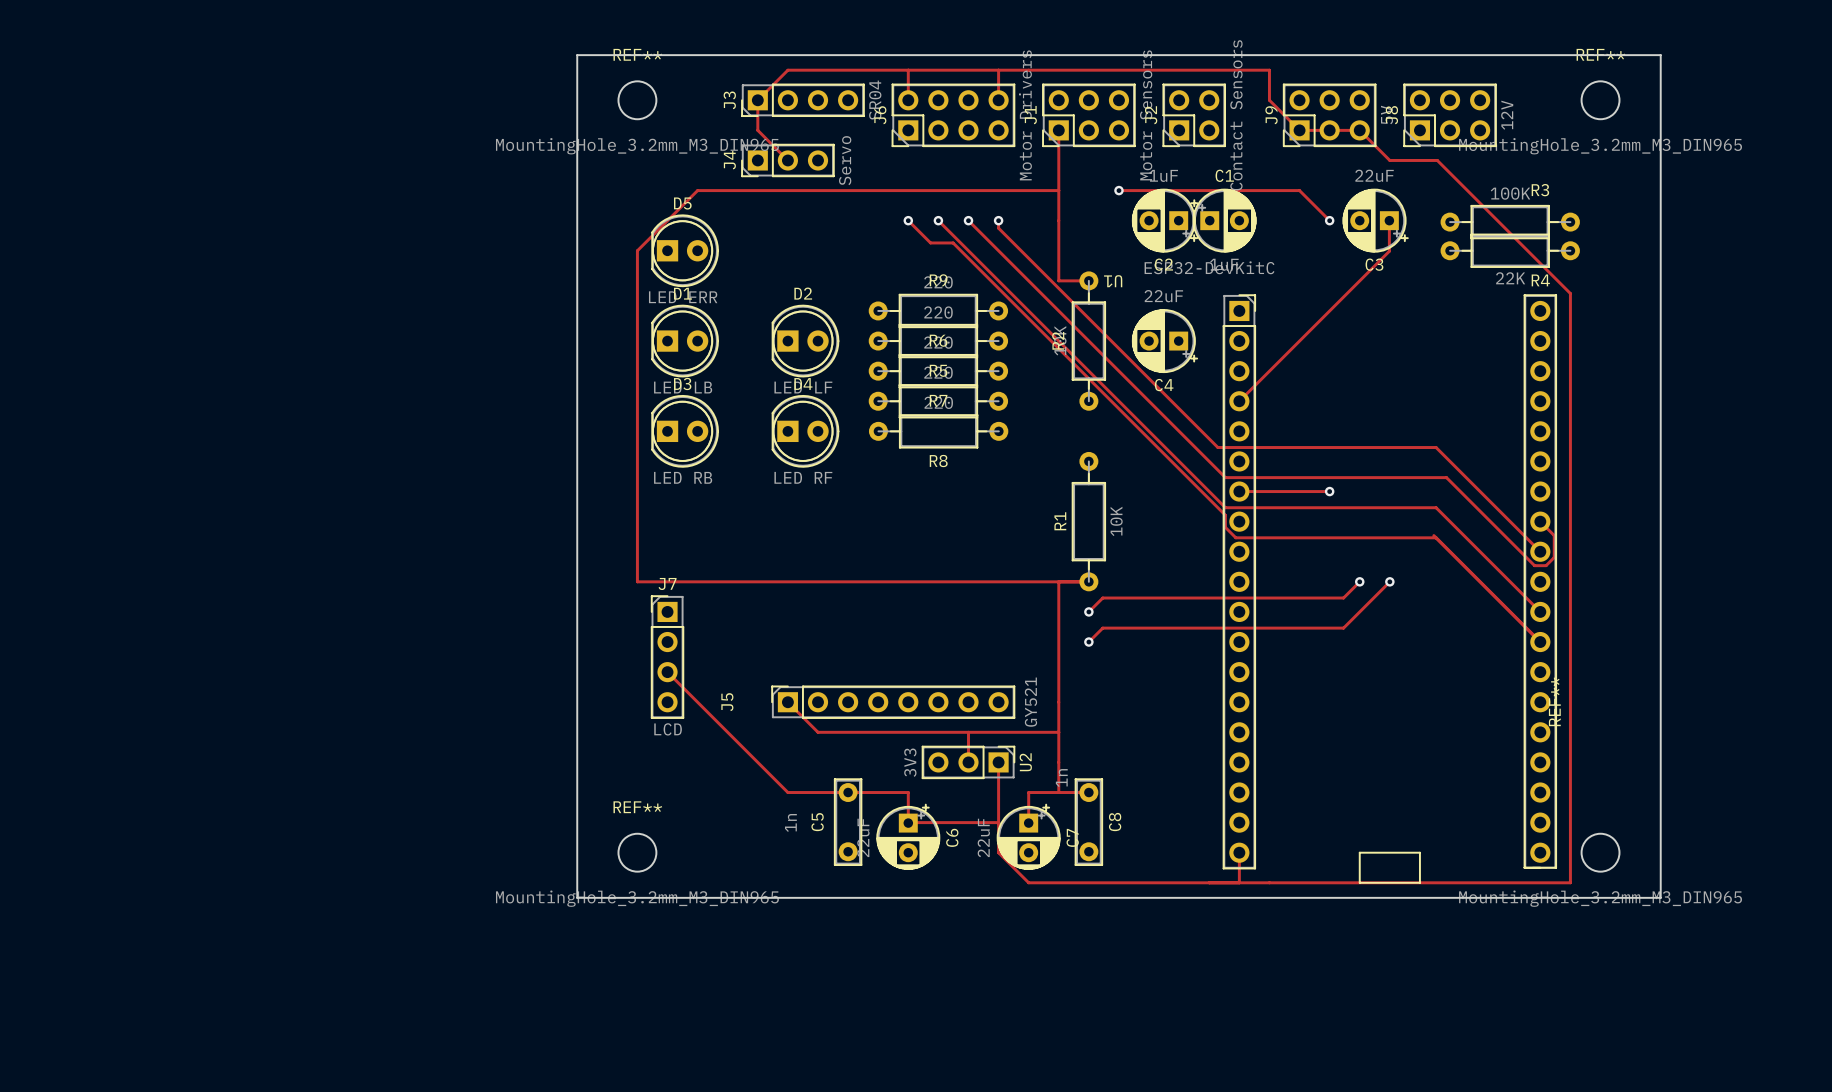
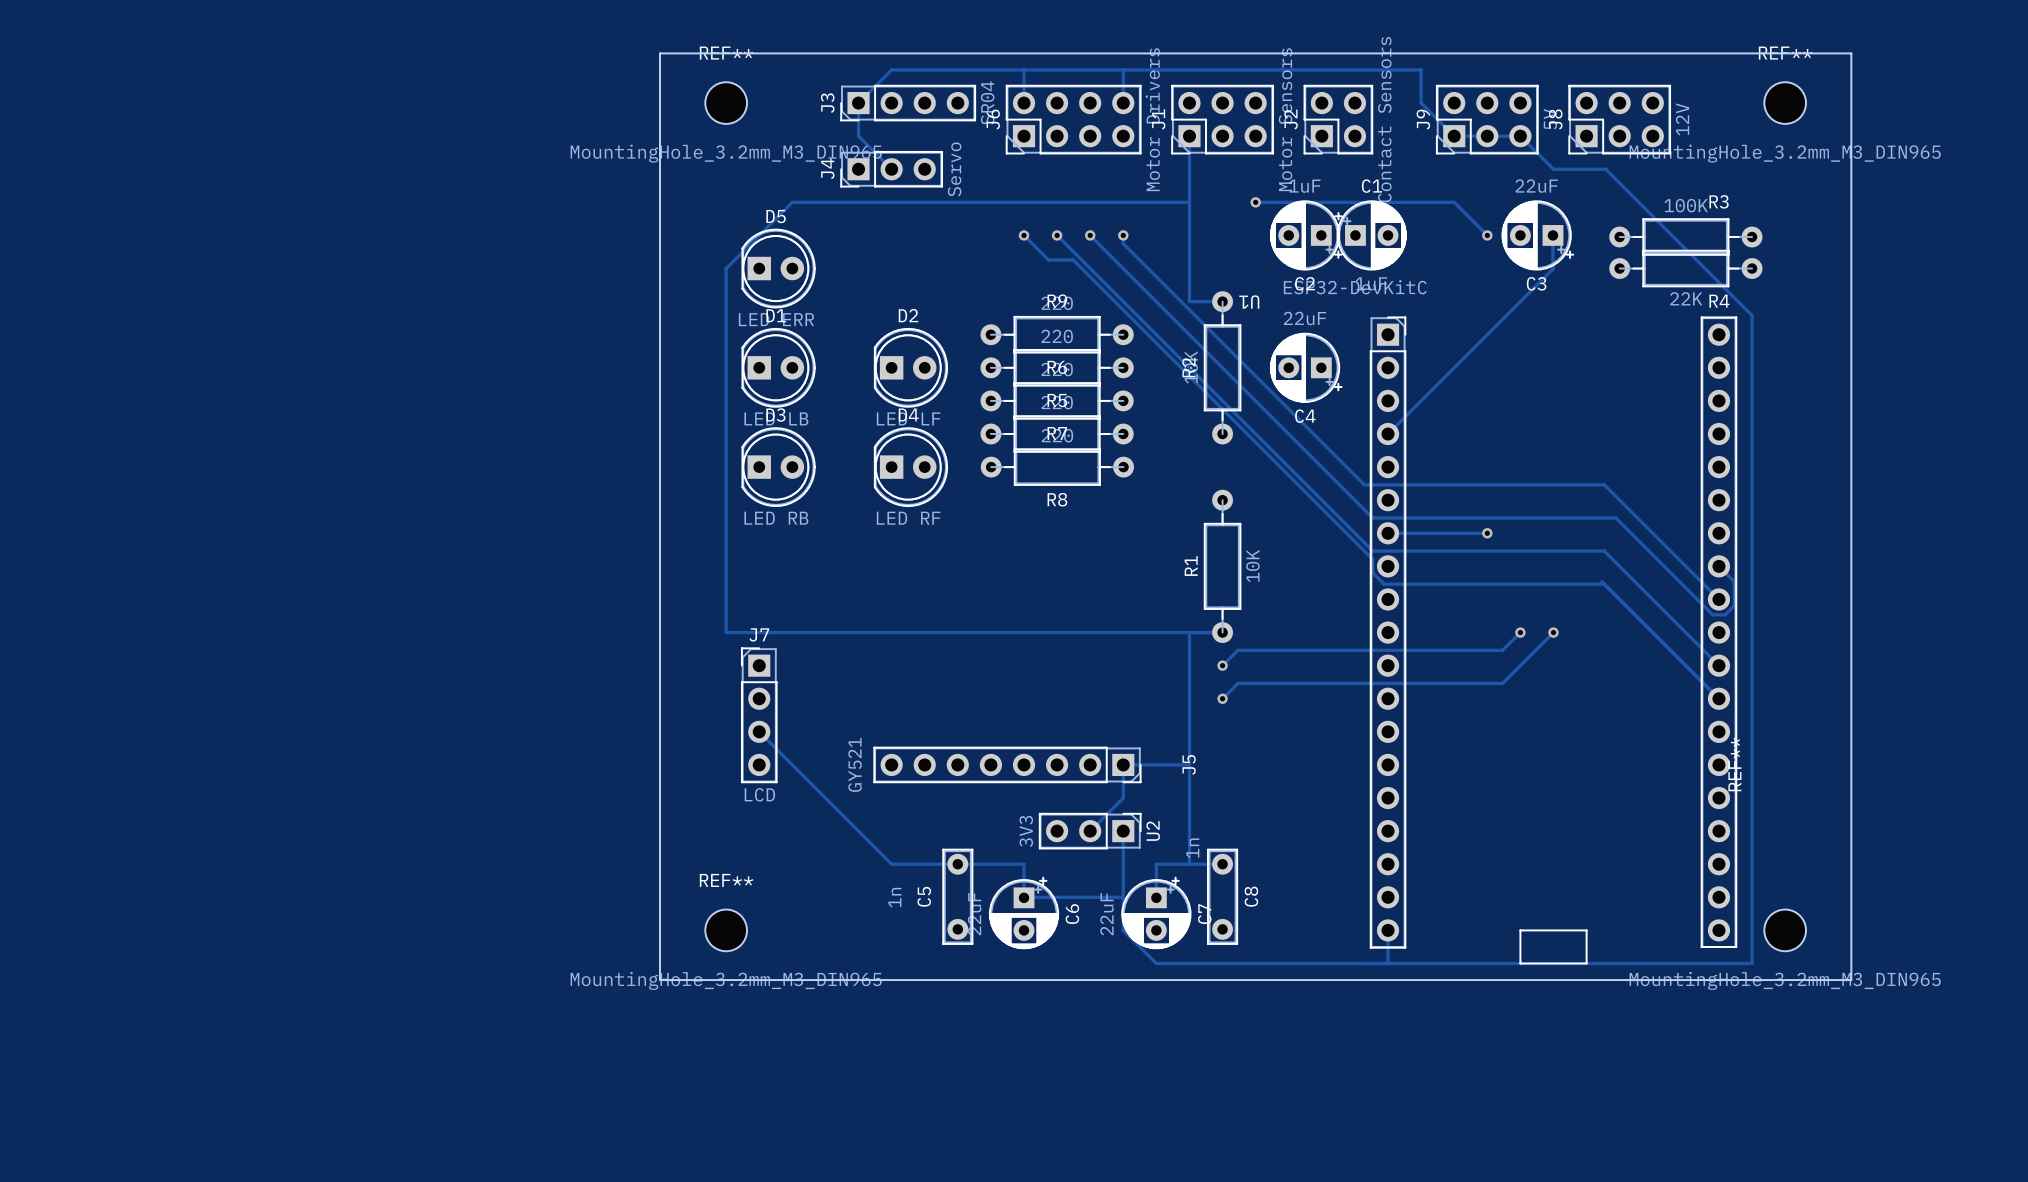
track: (787, 702) (818, 732) (1058, 732) -> none
J5 rotation: 0° (893, 702) -> 180° (1007, 764)
track: (968, 732) (968, 762) -> (1189, 764) (1123, 764) (1123, 798) (1090, 831)

